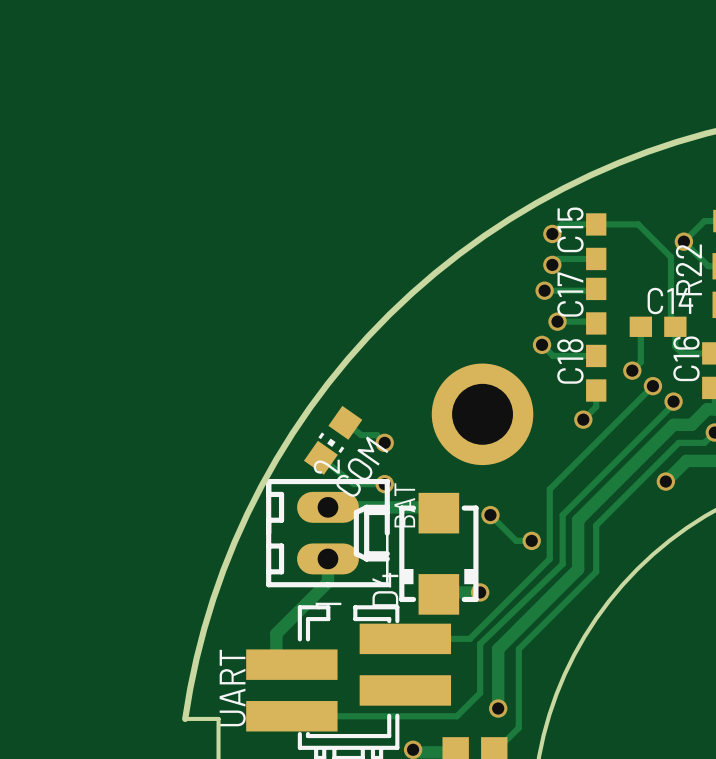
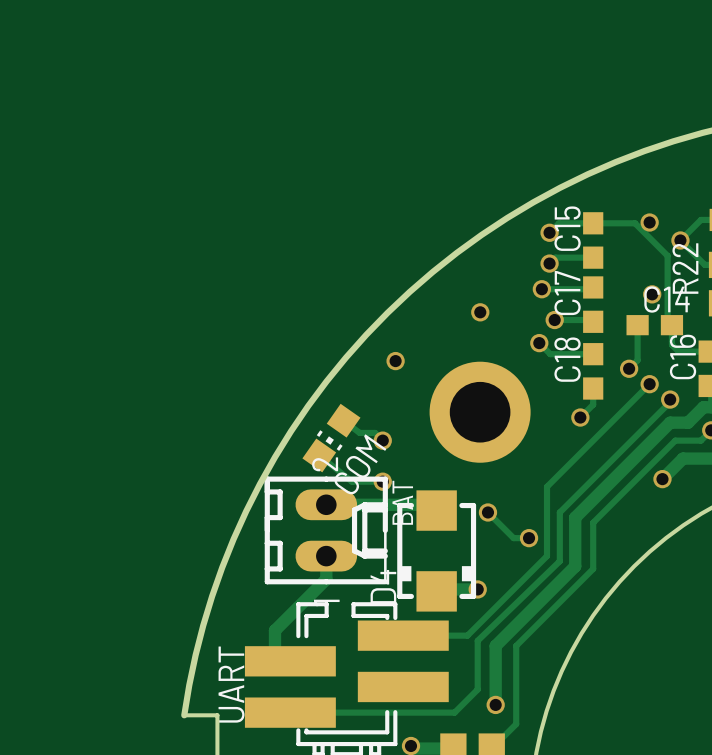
via: none -> (649, 222)
via: none -> (652, 294)
via: none -> (480, 312)
via: none -> (395, 361)

